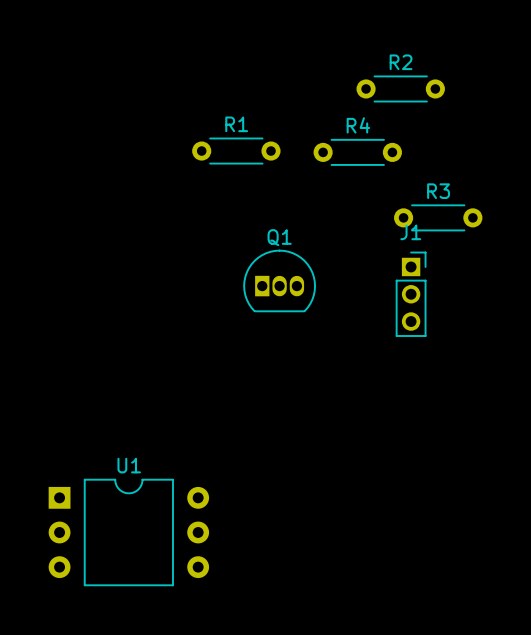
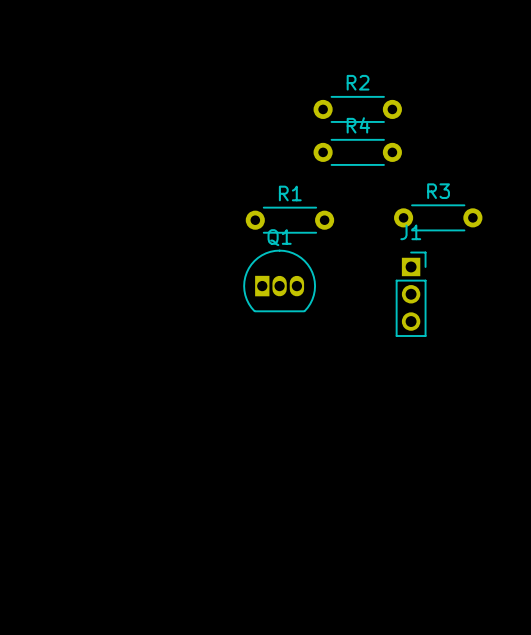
R2 position: (400, 88) -> (357, 109)
R1 position: (236, 151) -> (289, 220)
U1: (128, 532) -> none

